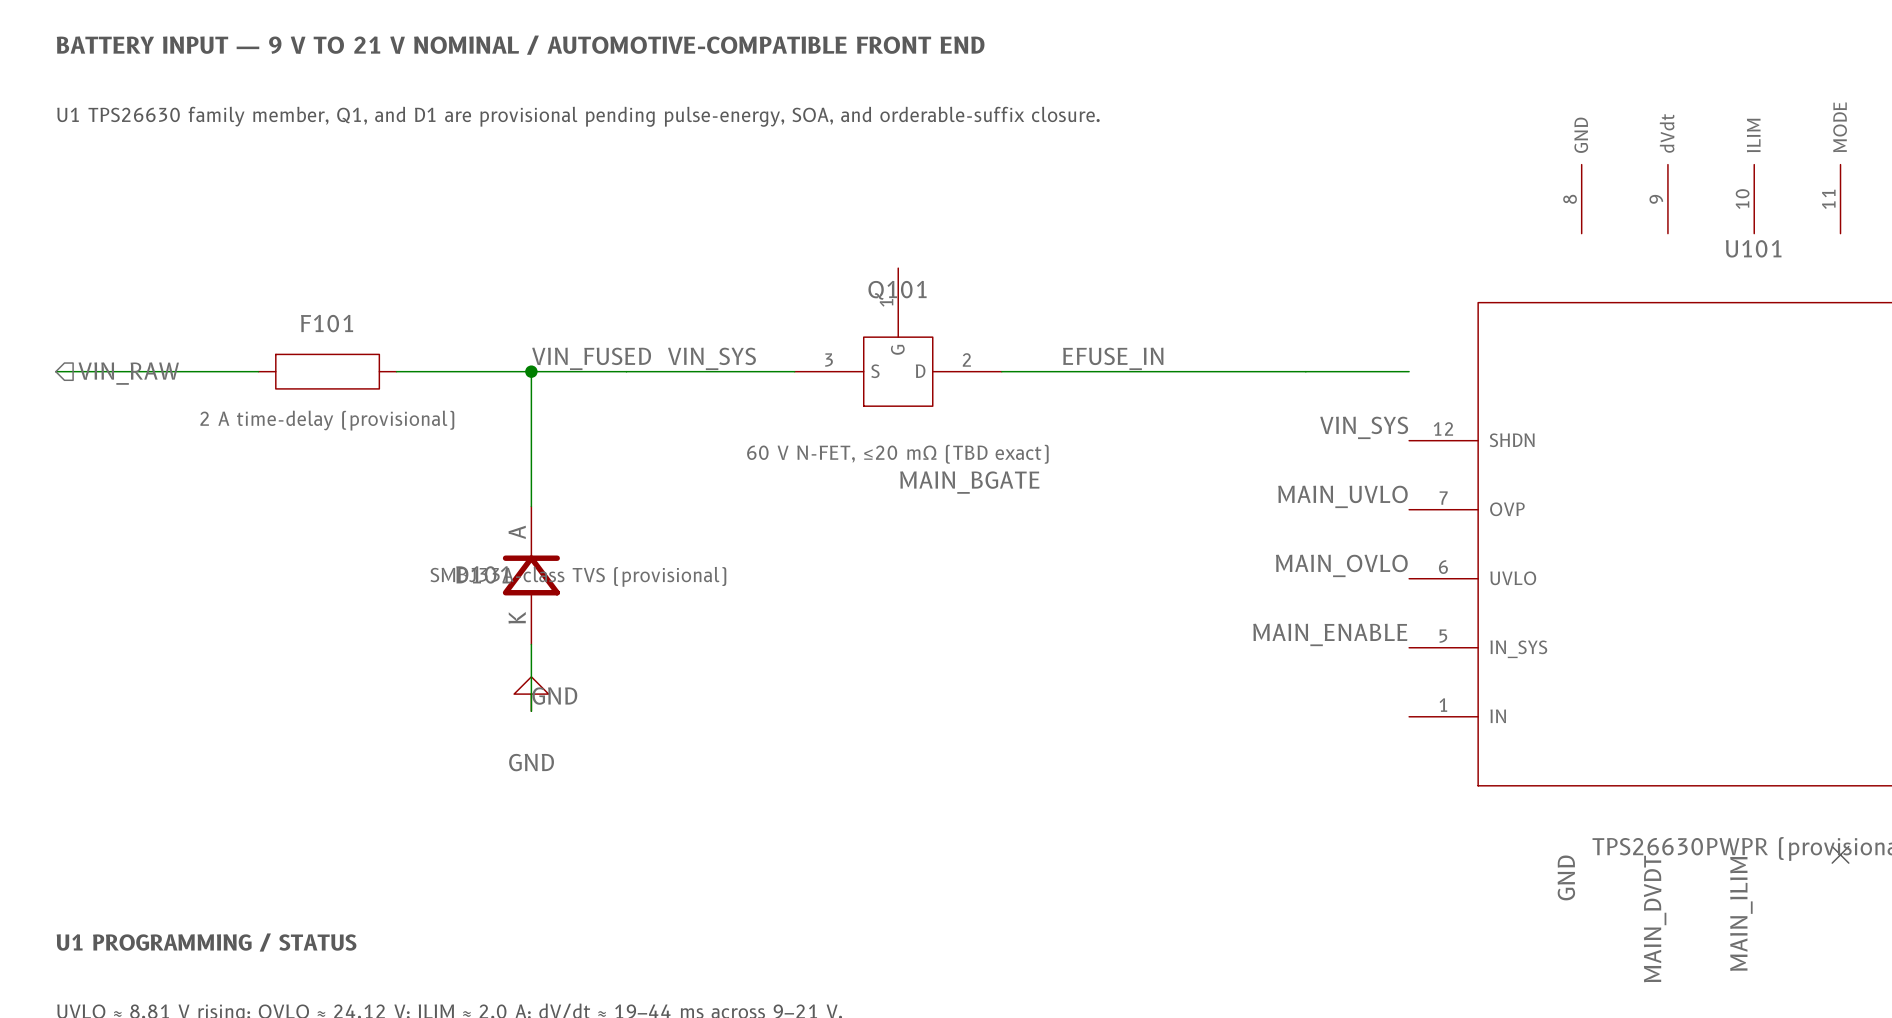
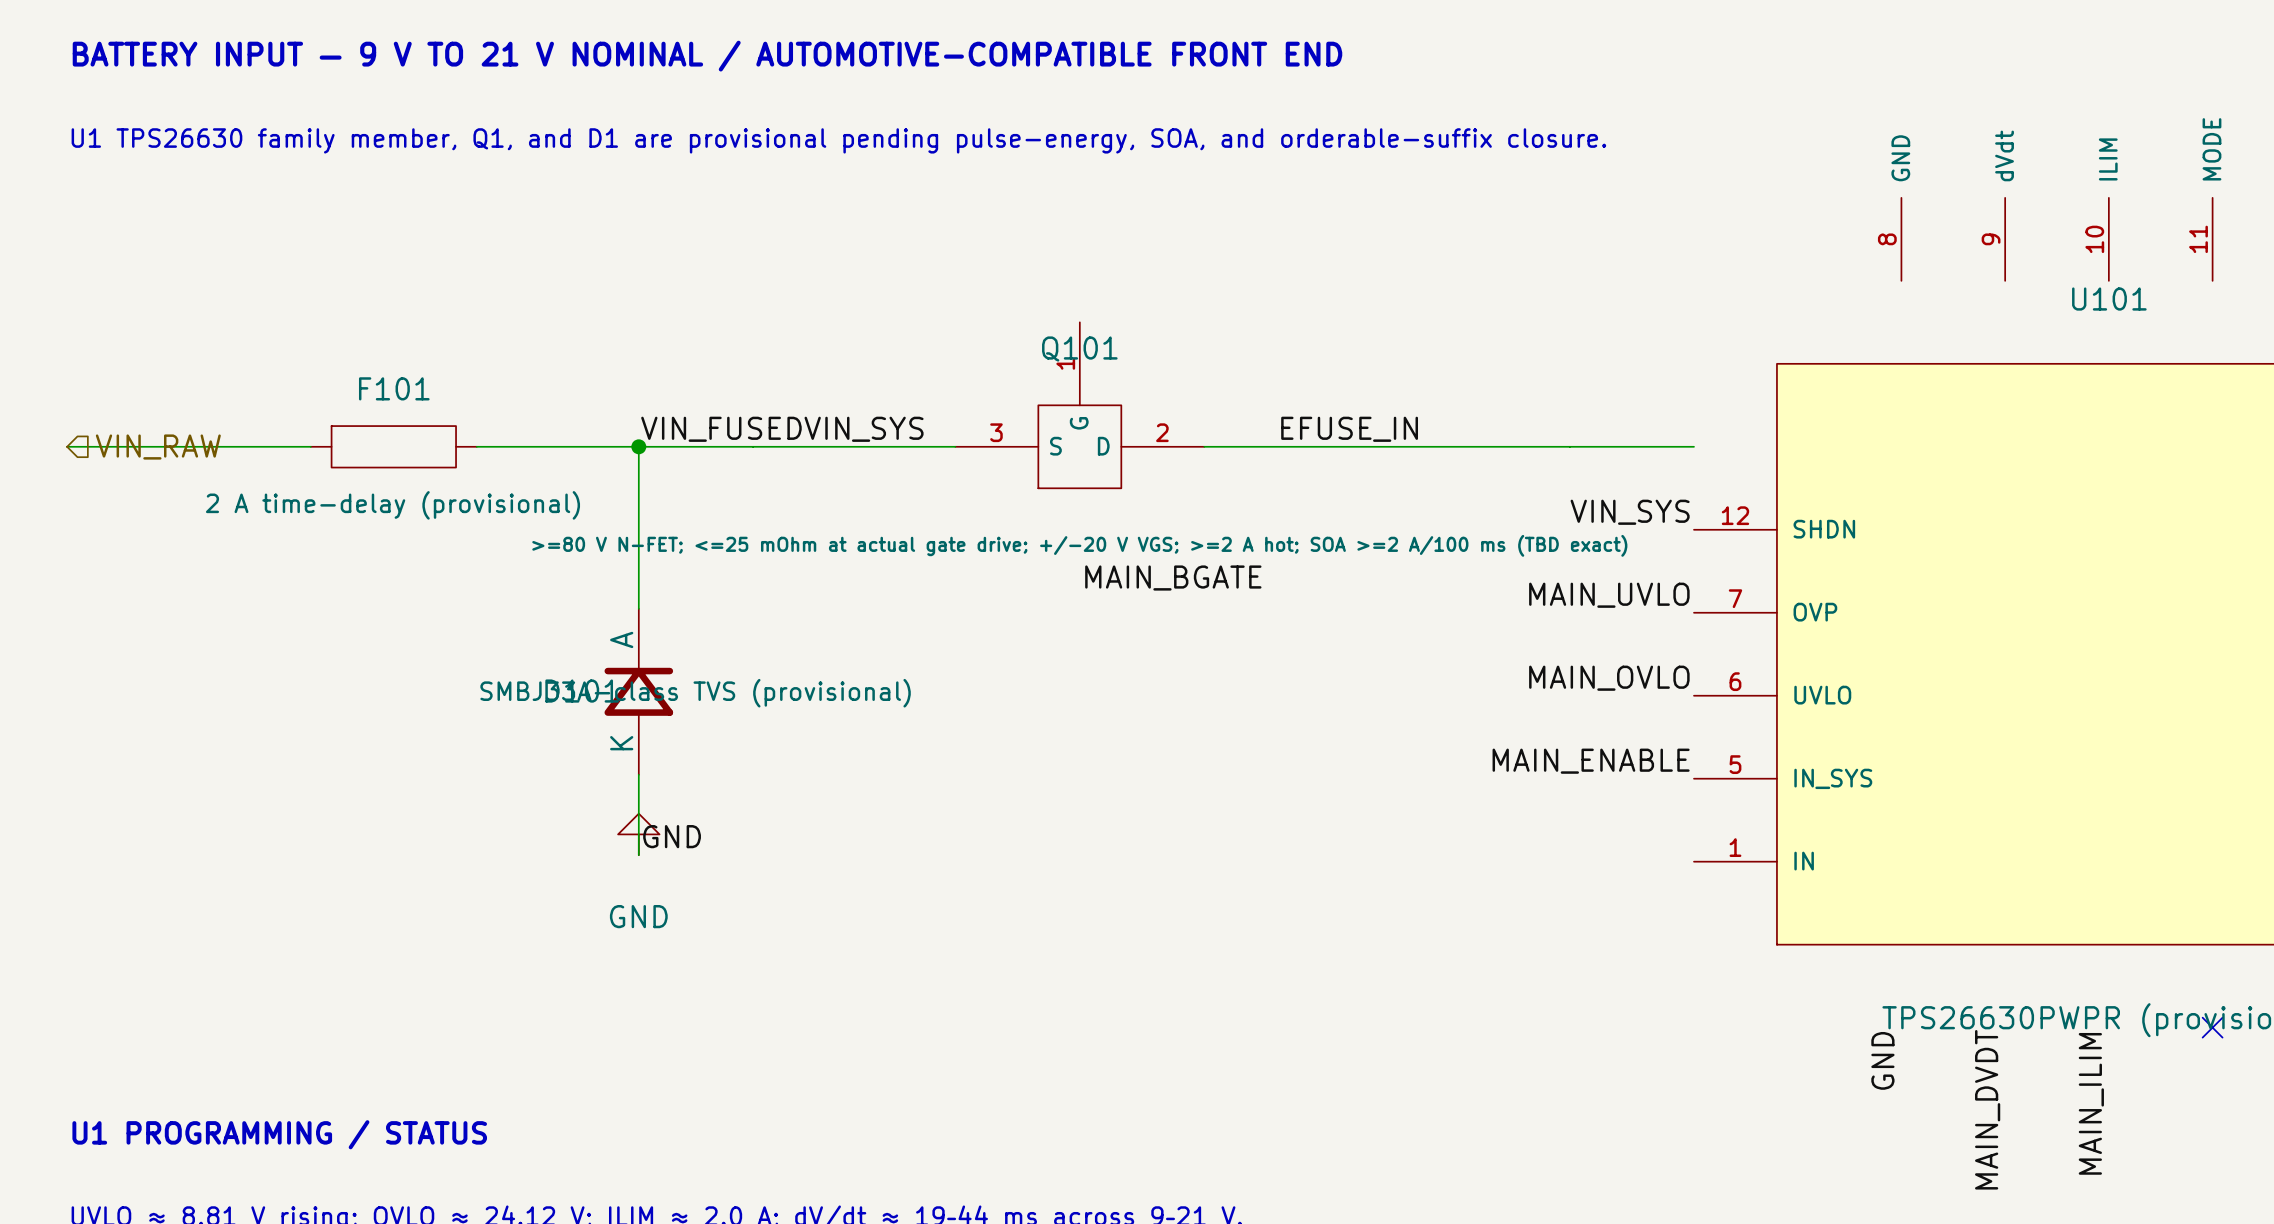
Q101 value: 60 V N-FET, ≤20 mΩ (TBD exact) (897, 454) -> >=80 V N-FET; <=25 mOhm at actual gate drive; +/-20 V VGS; >=2 A hot; SOA >=2 A/100 ms (TBD exact) (1079, 545)

